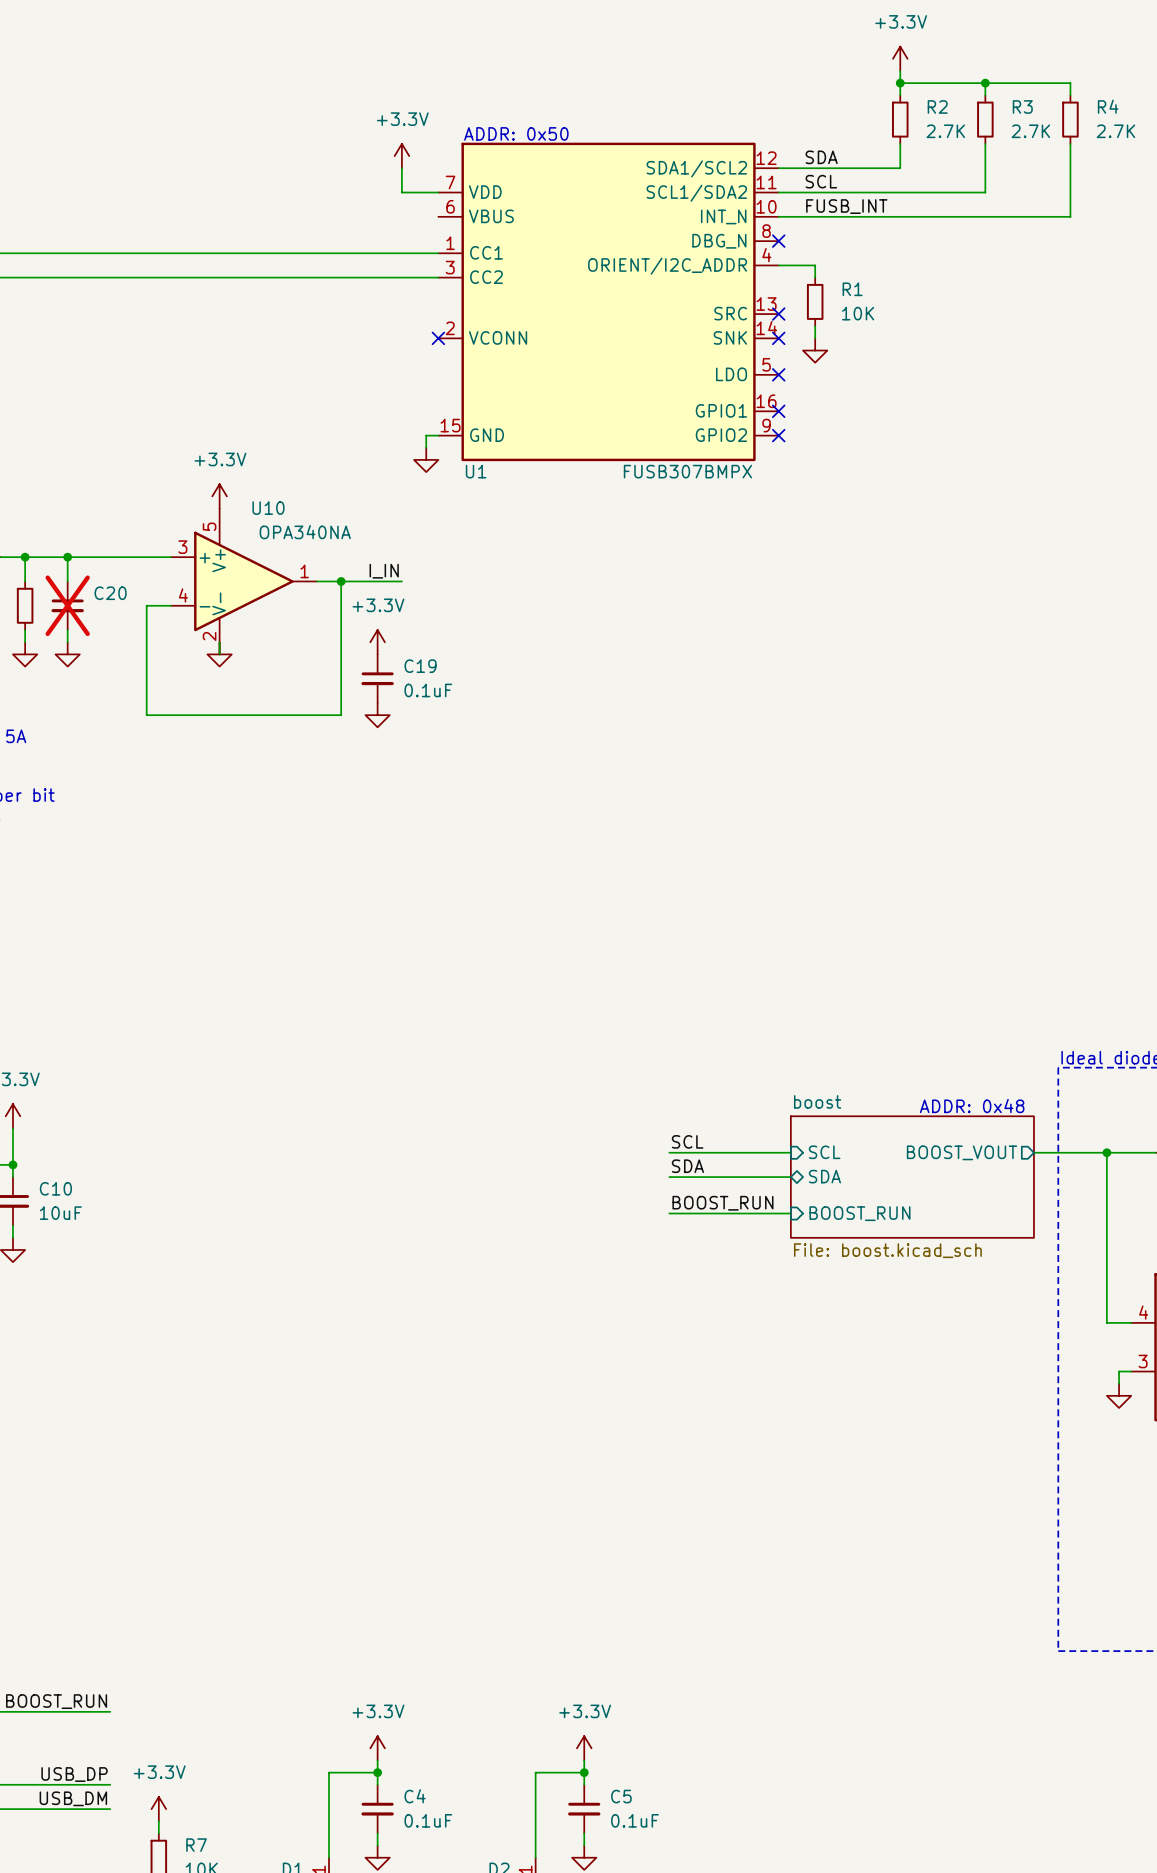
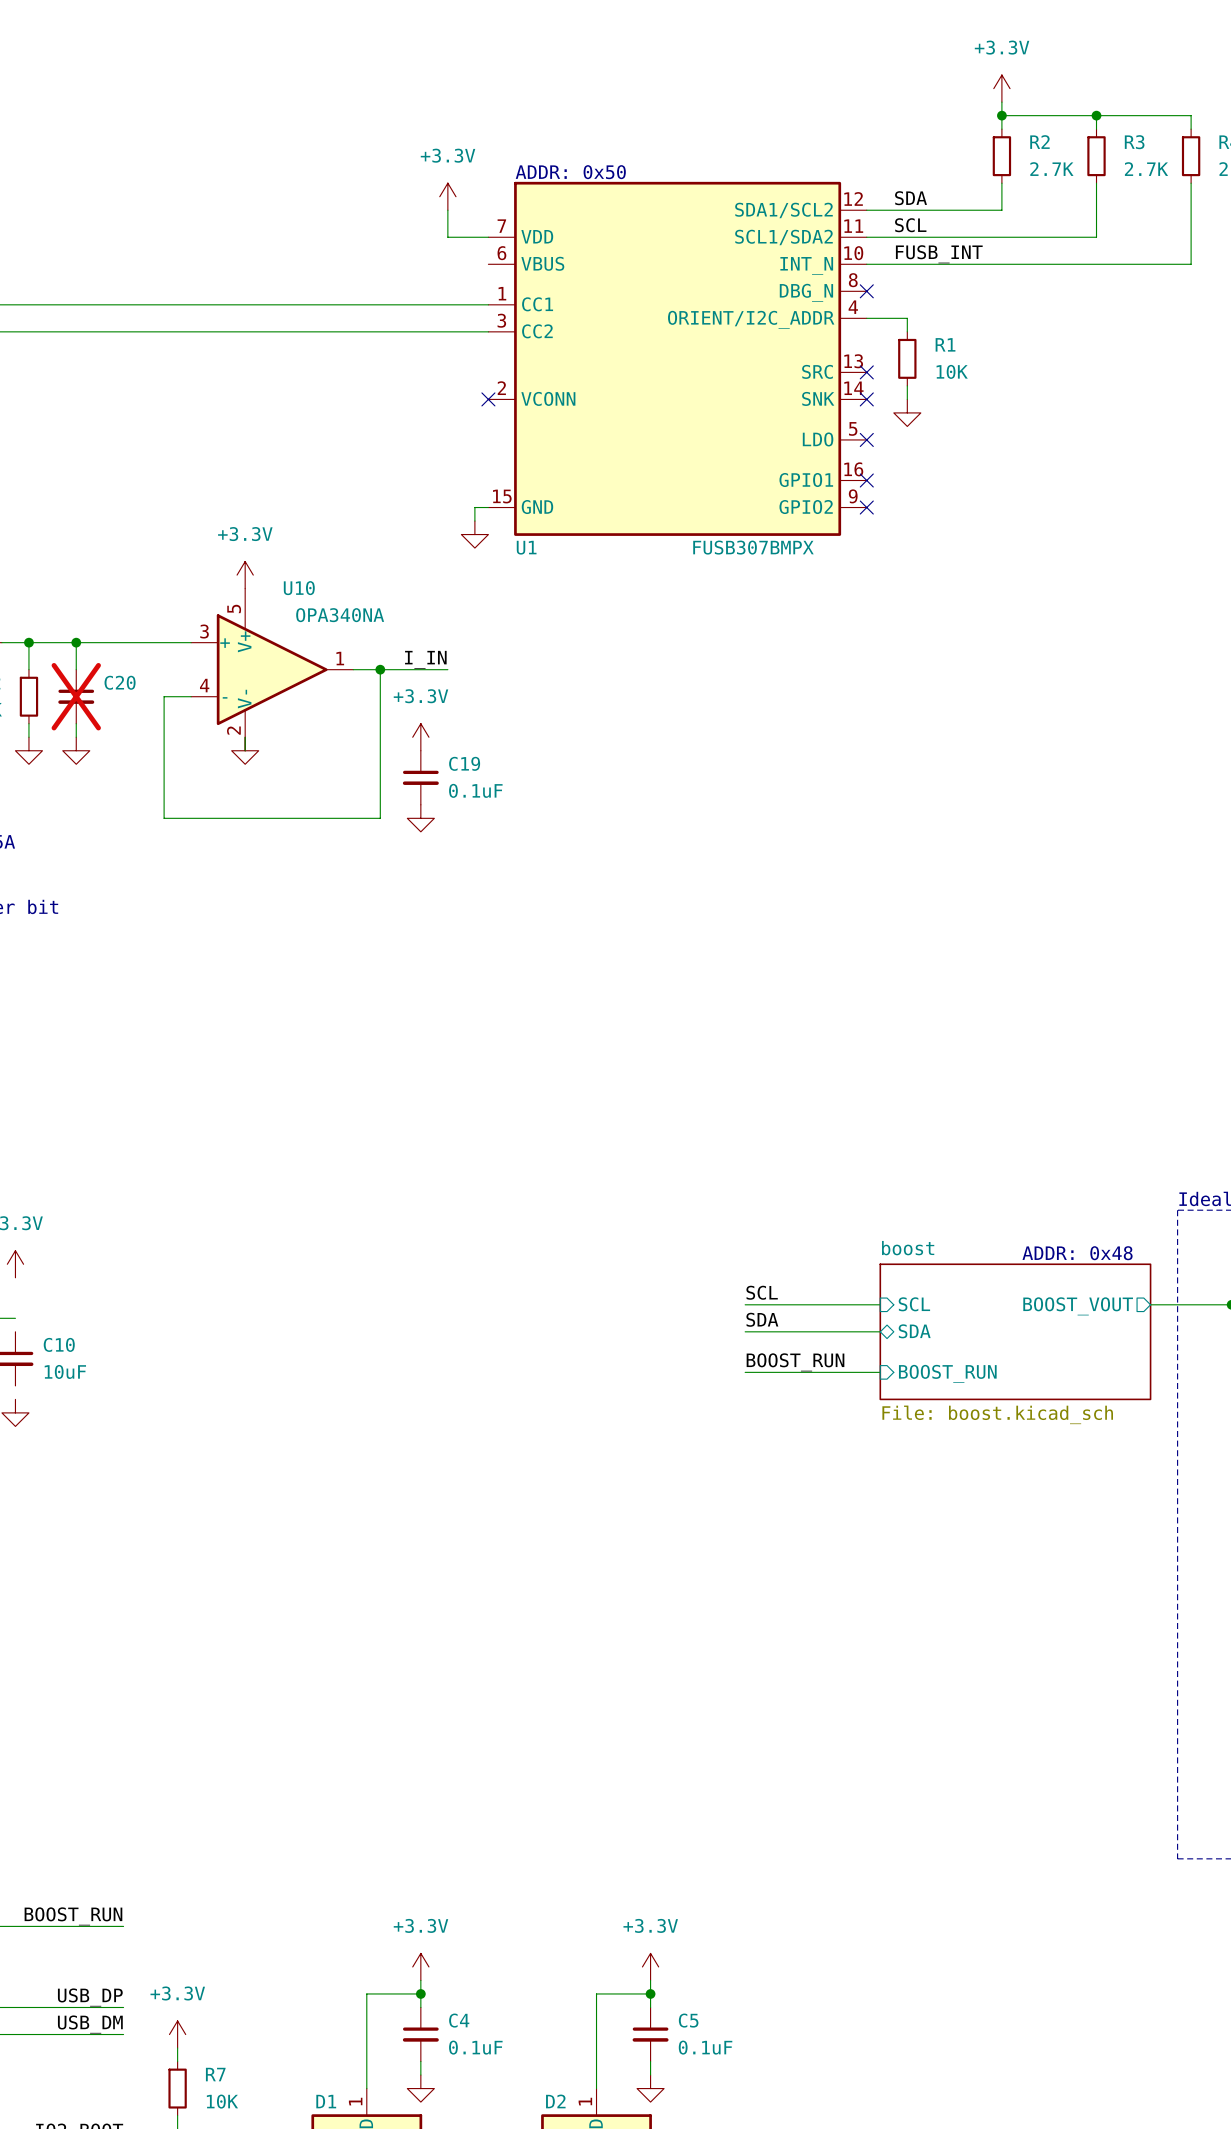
wire: (12, 1128) (12, 1177) -> none
junction: (12, 1164) -> none
wire: (12, 1225) (12, 1237) -> none

